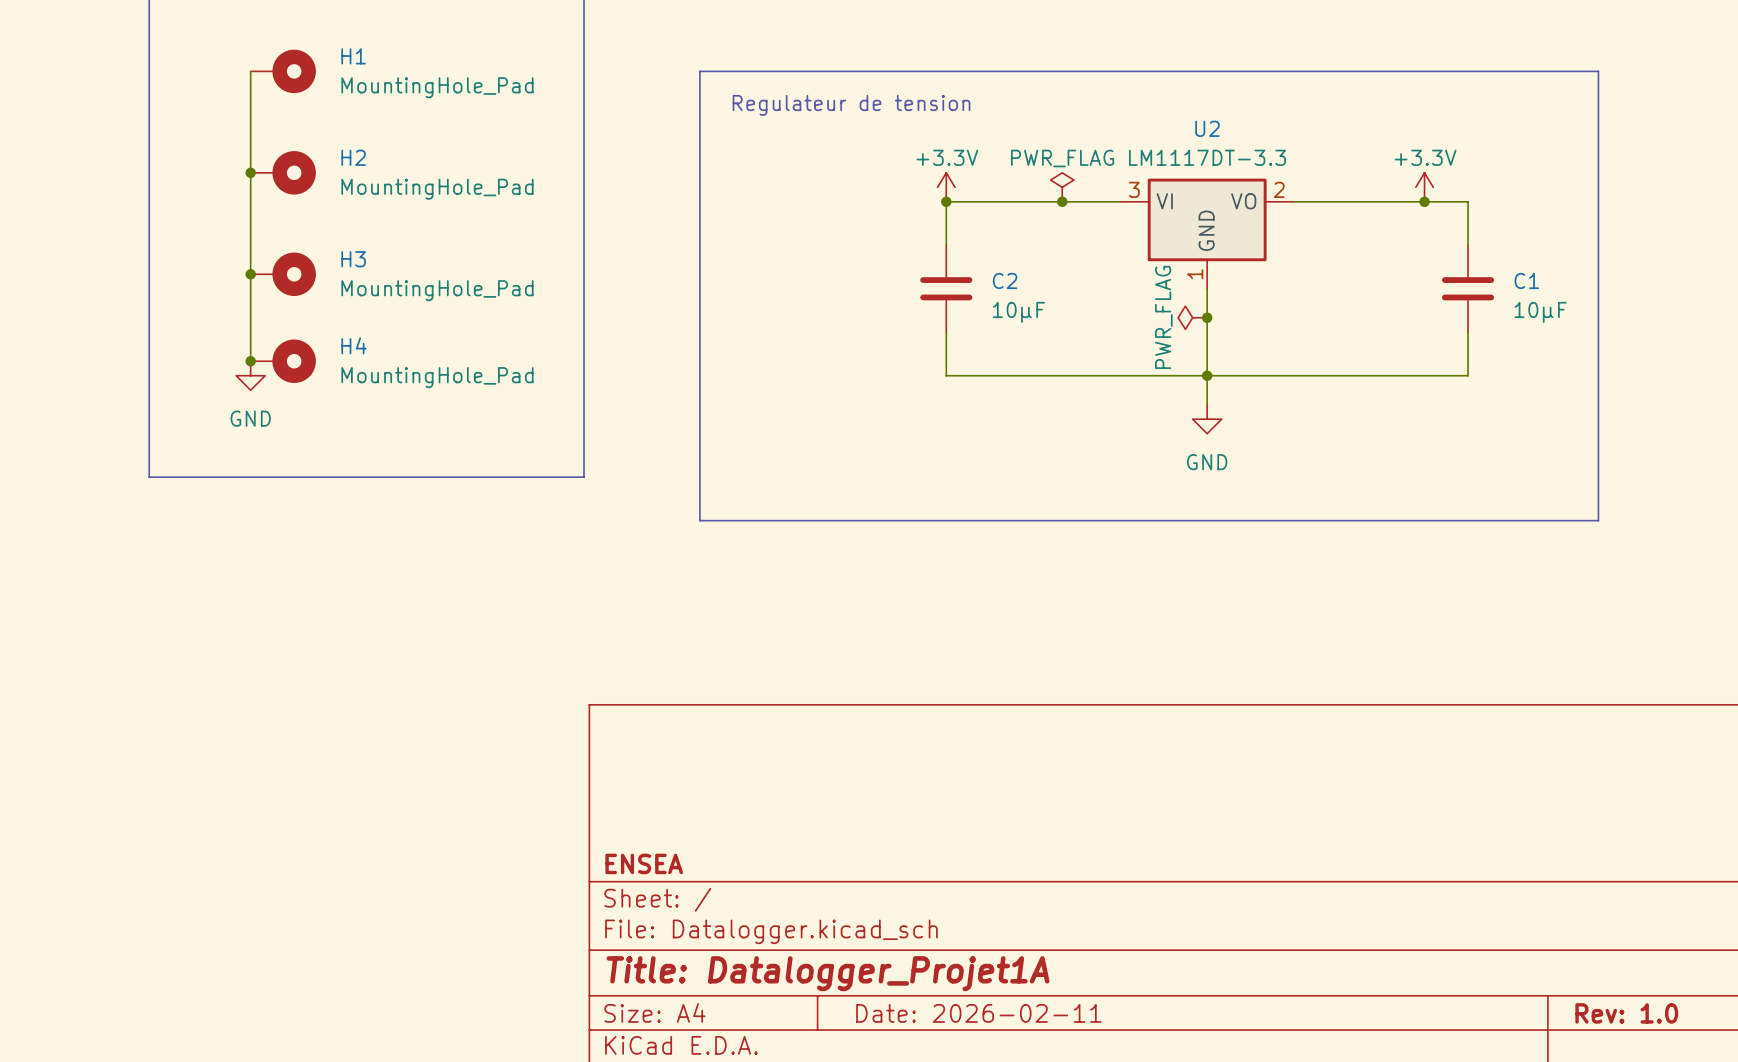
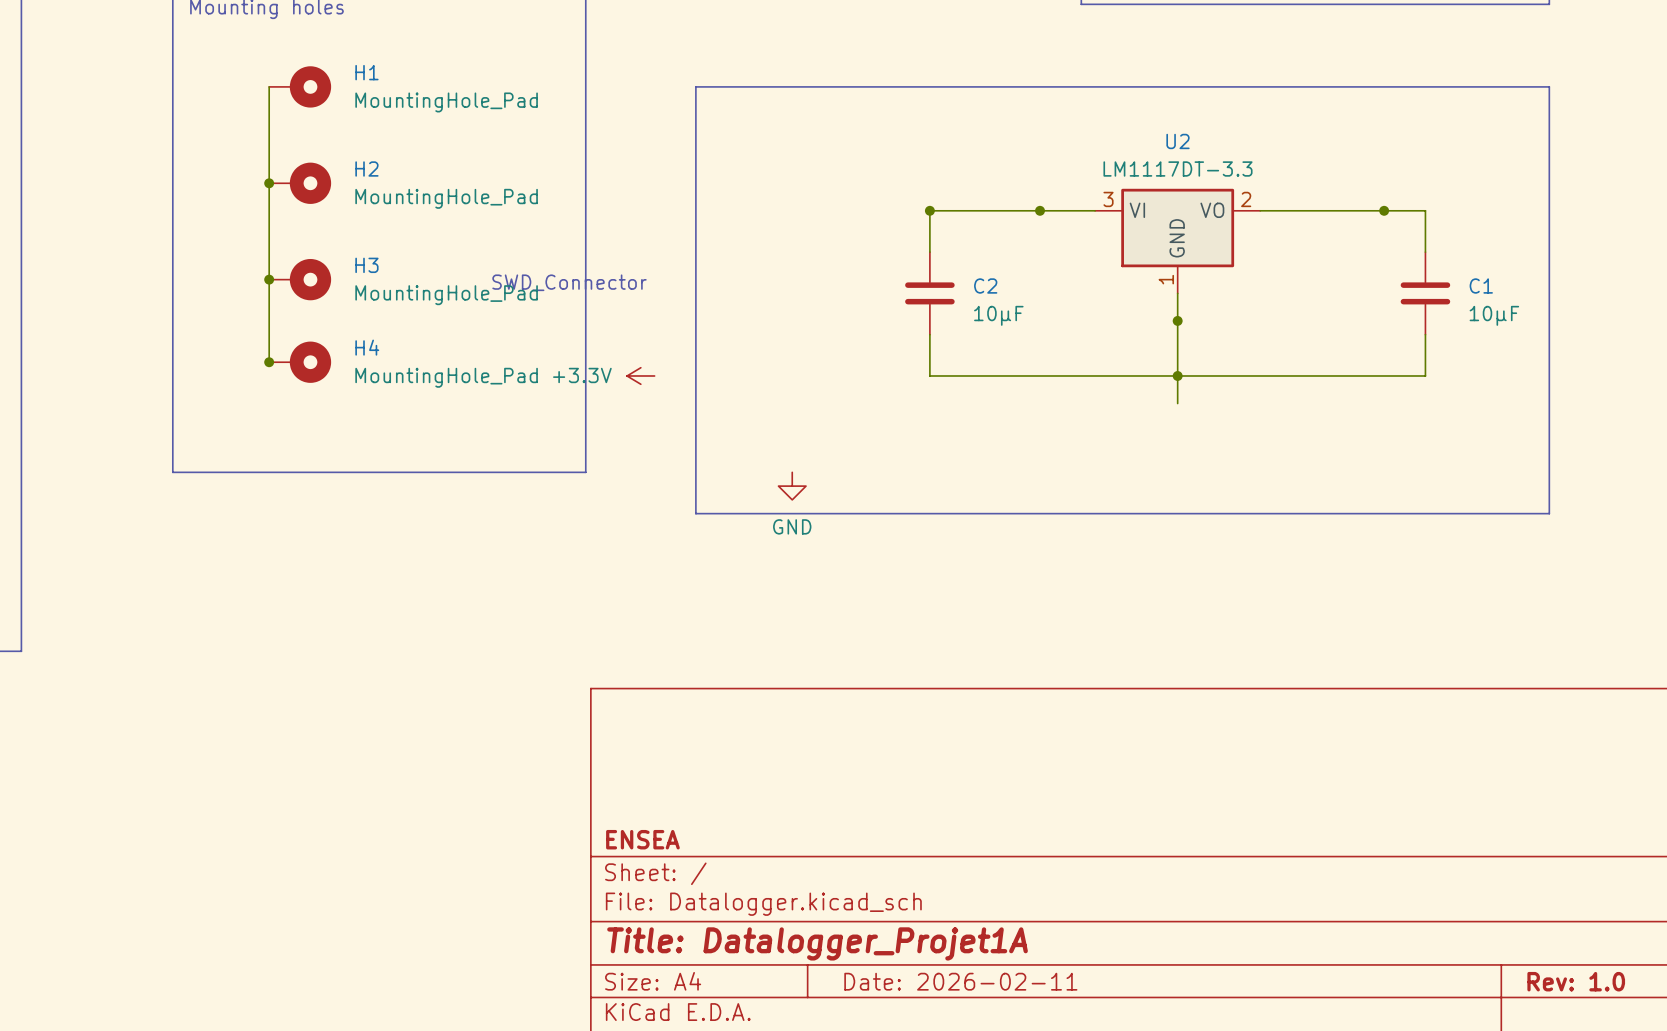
text: Regulateur de tension (851, 105) -> none
power symbol: +3.3V (946, 187) -> none
power symbol: PWR_FLAG (1062, 187) -> none
power symbol: +3.3V (1424, 187) -> none
text: none -> SWD_Connector (569, 282)
power symbol: PWR_FLAG (1192, 317) -> none
power symbol: GND (250, 375) -> none
power symbol: none -> +3.3V (640, 375)
power symbol: GND (1207, 419) -> none
power symbol: none -> GND (792, 486)

